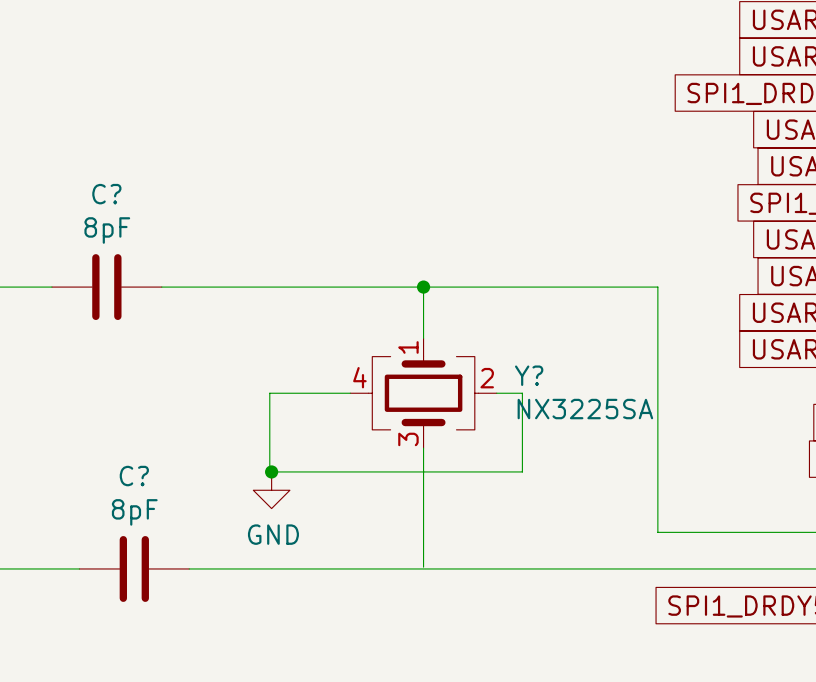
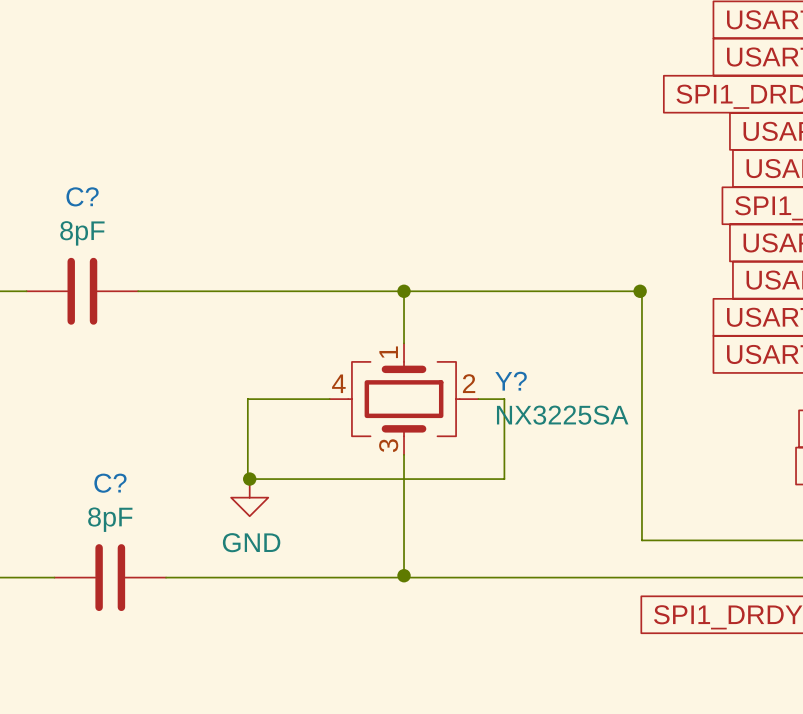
junction: none -> (640, 291)
junction: none -> (404, 575)

